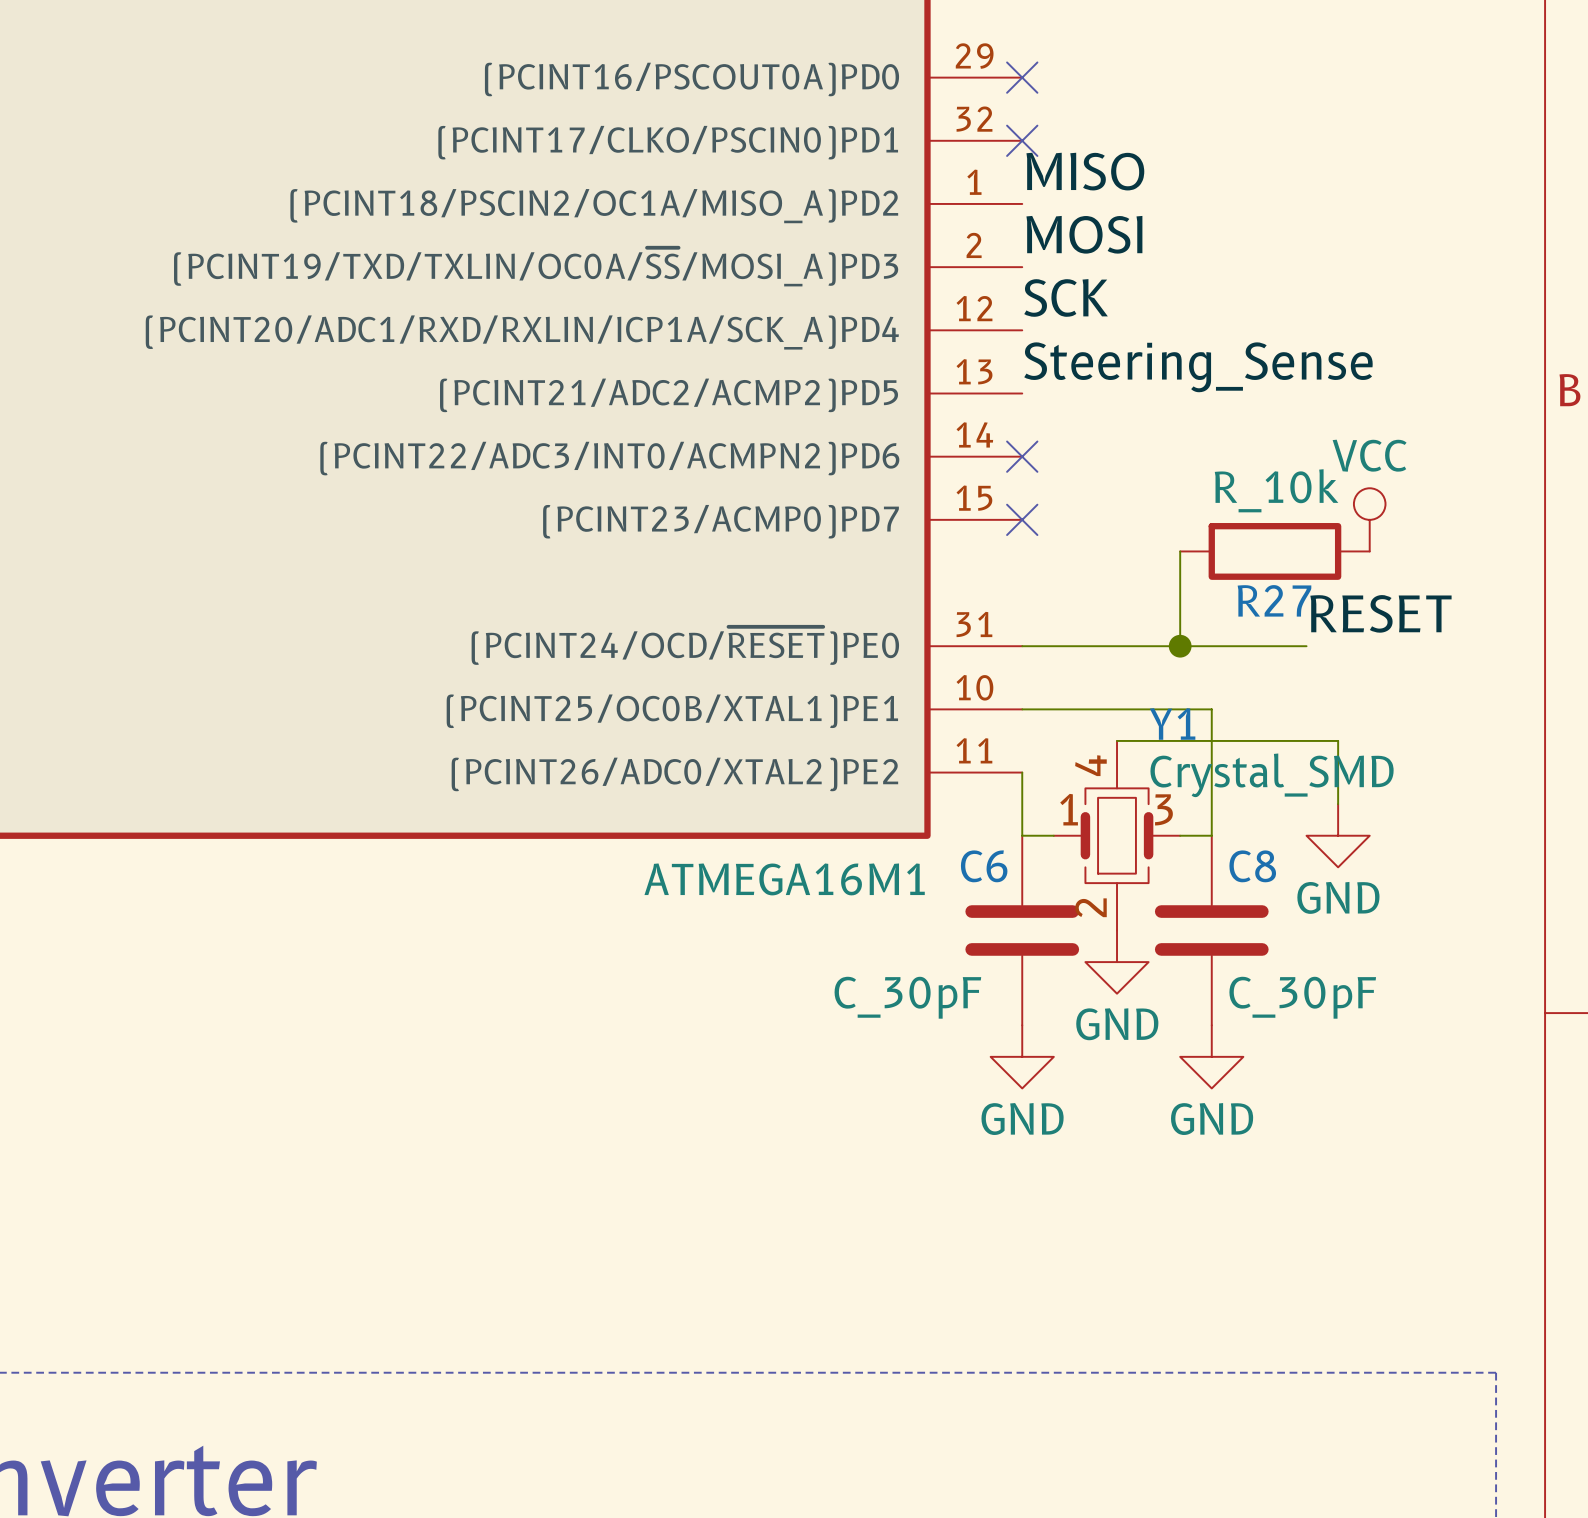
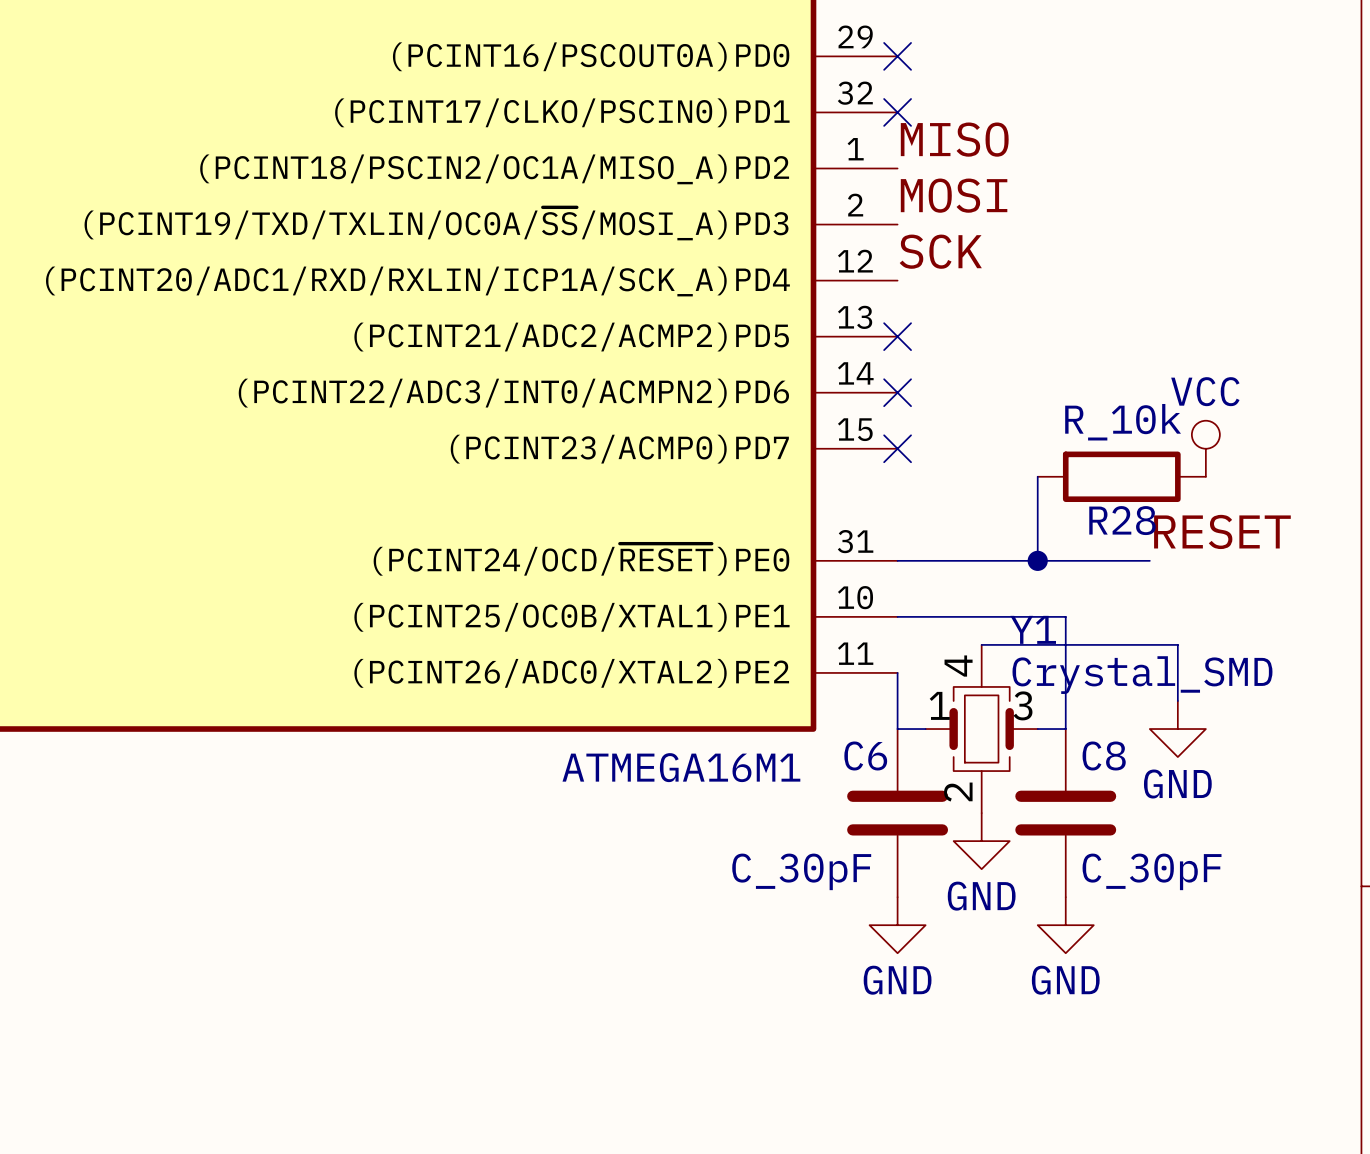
label: Steering_Sense (1198, 367) -> none
no-connect mark: none -> (897, 336)
R27 name: R27 (1274, 600) -> R28 (1122, 520)

